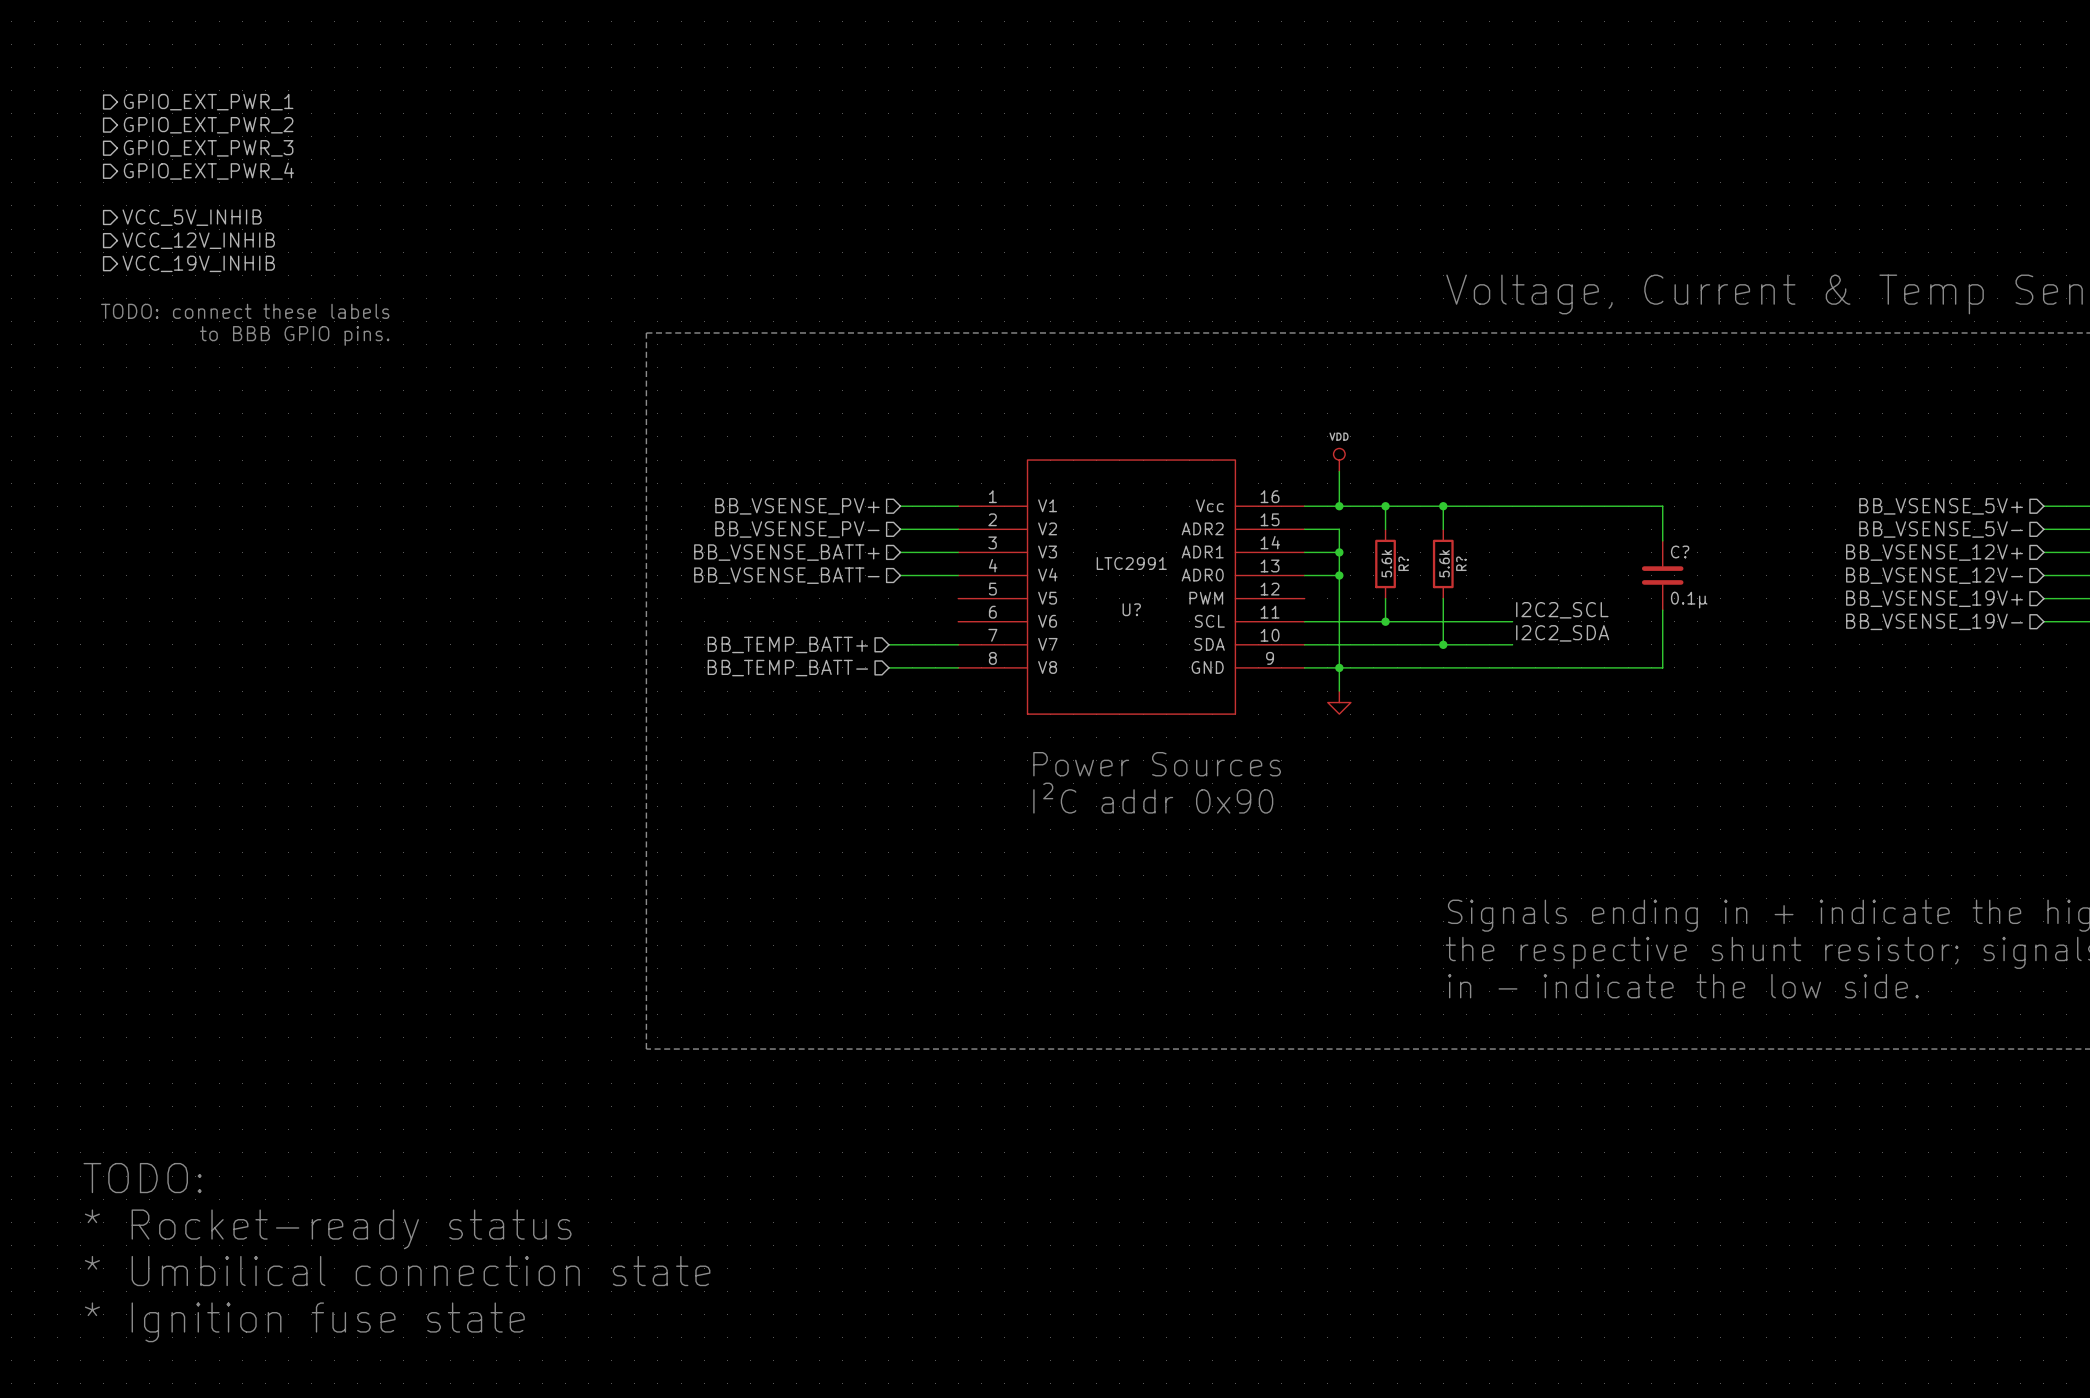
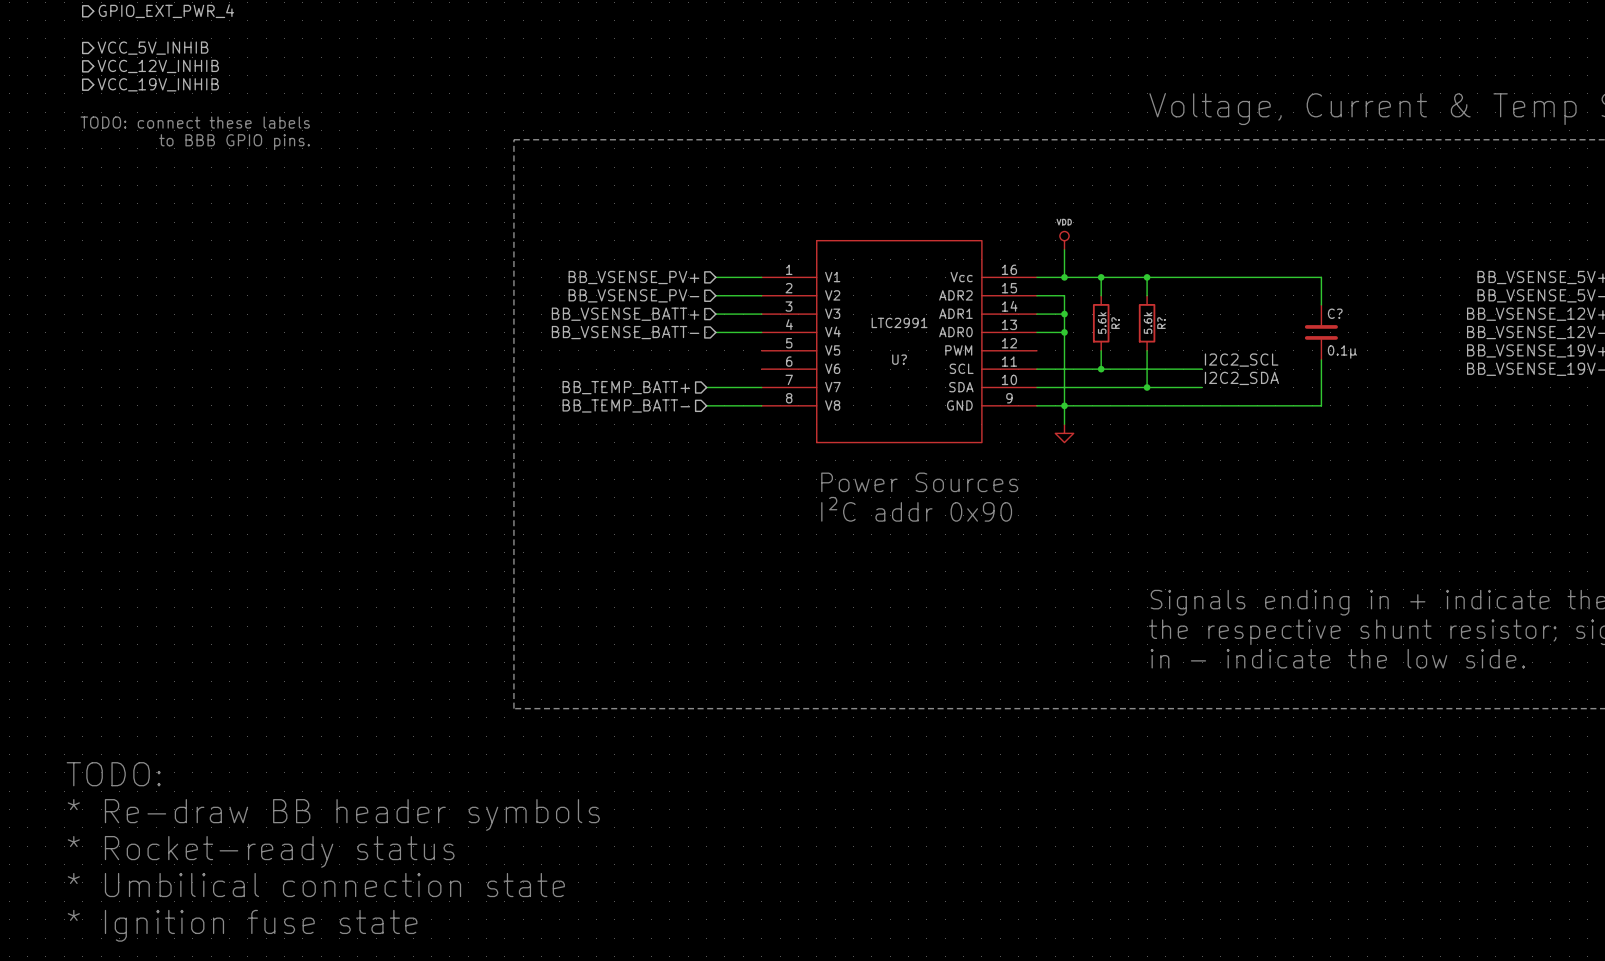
text: none -> TODO: (113, 774)
text: TODO: (142, 1178) -> * Re-draw BB header symbols (333, 814)

